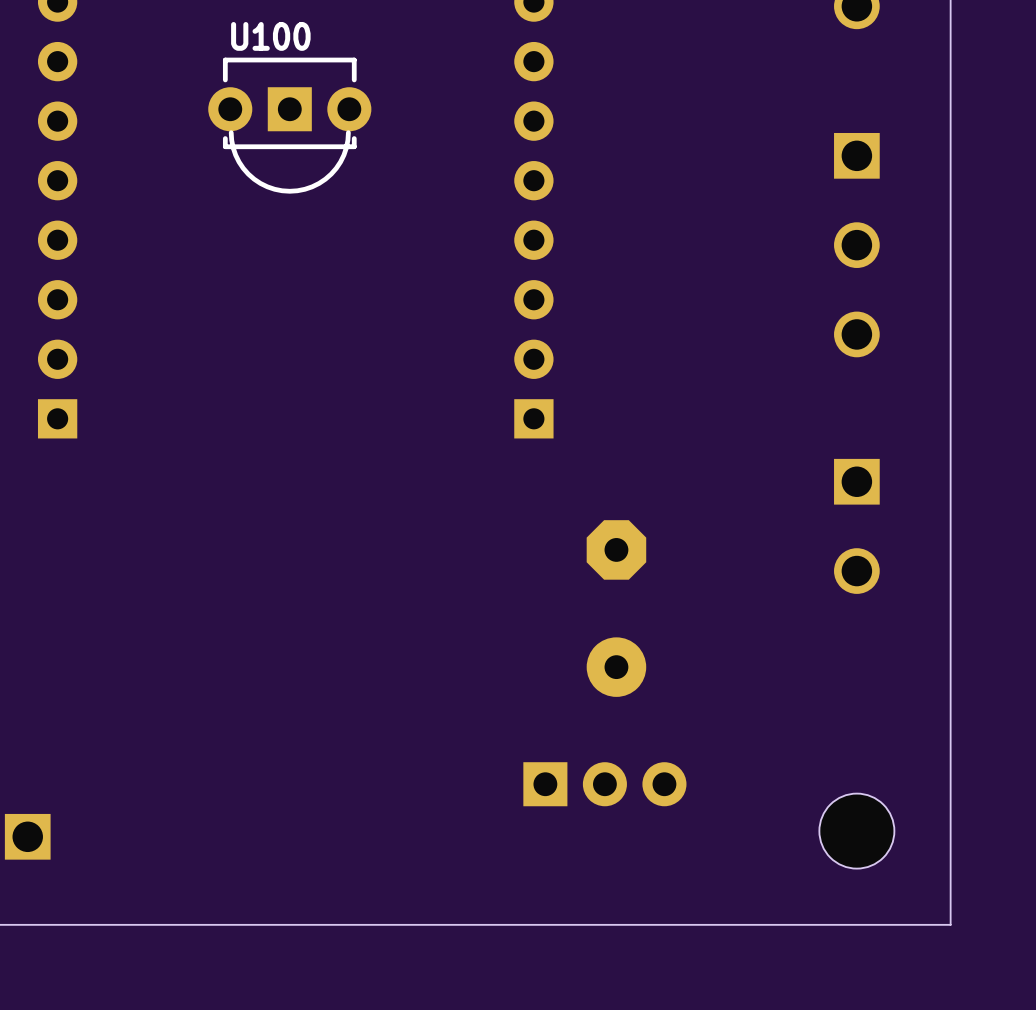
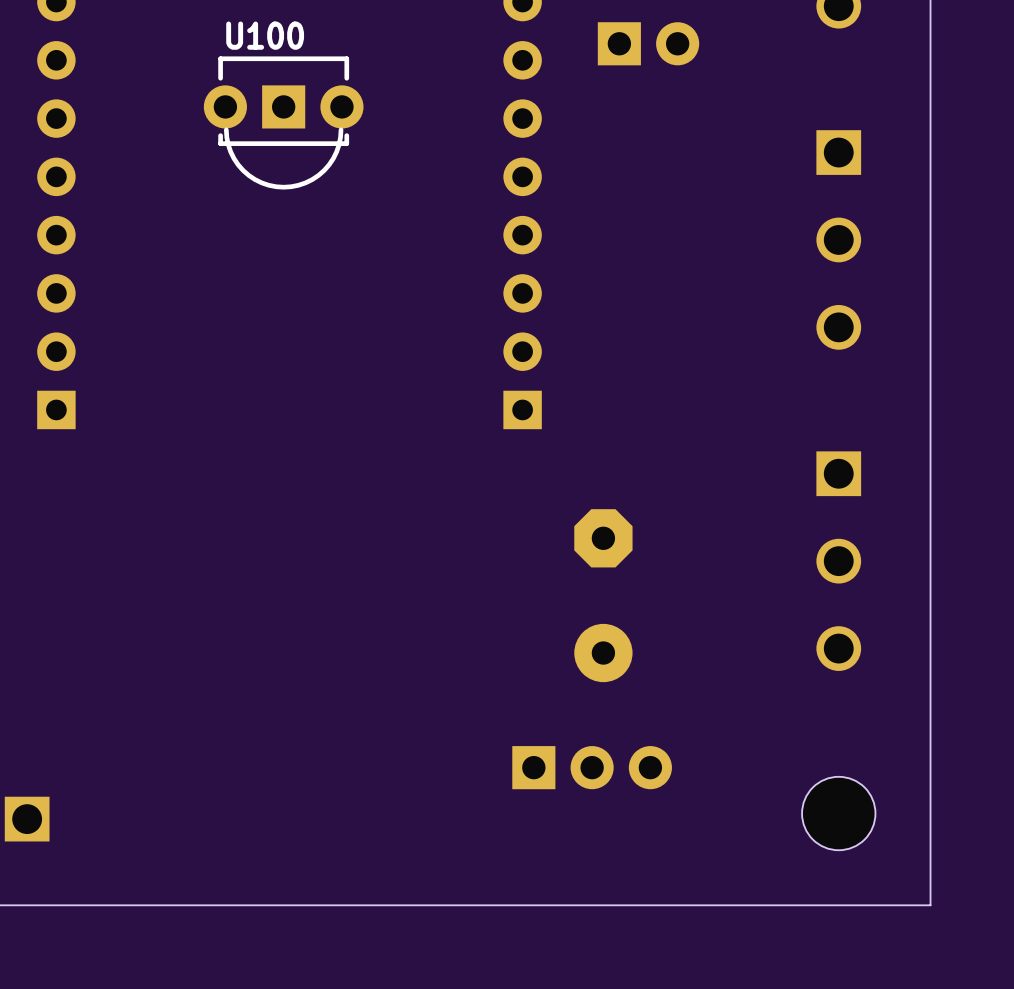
part: none -> (648, 43)
part: (856, 526) -> none
part: none -> (838, 561)

